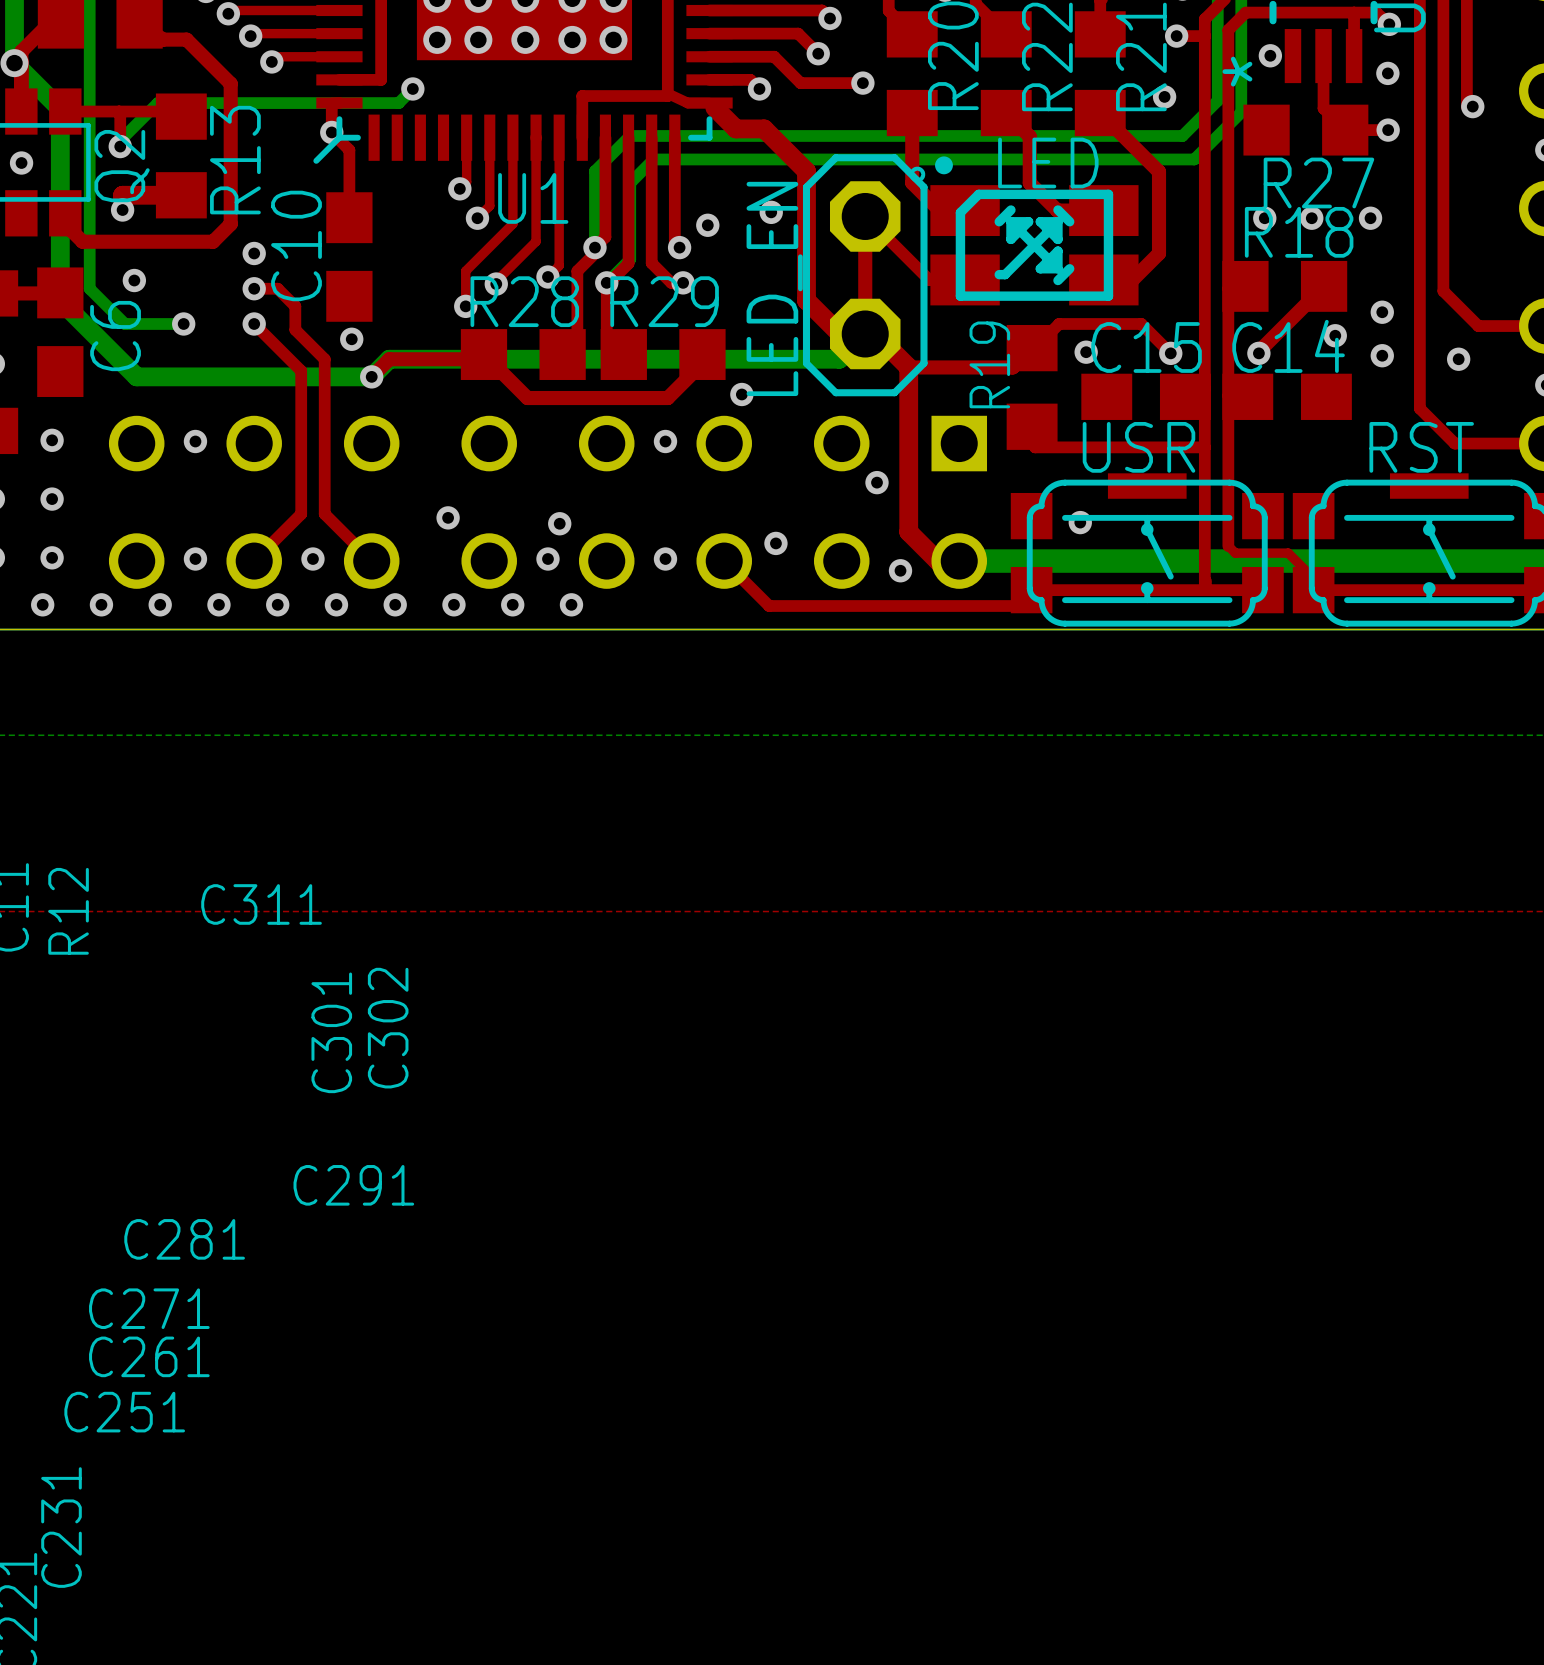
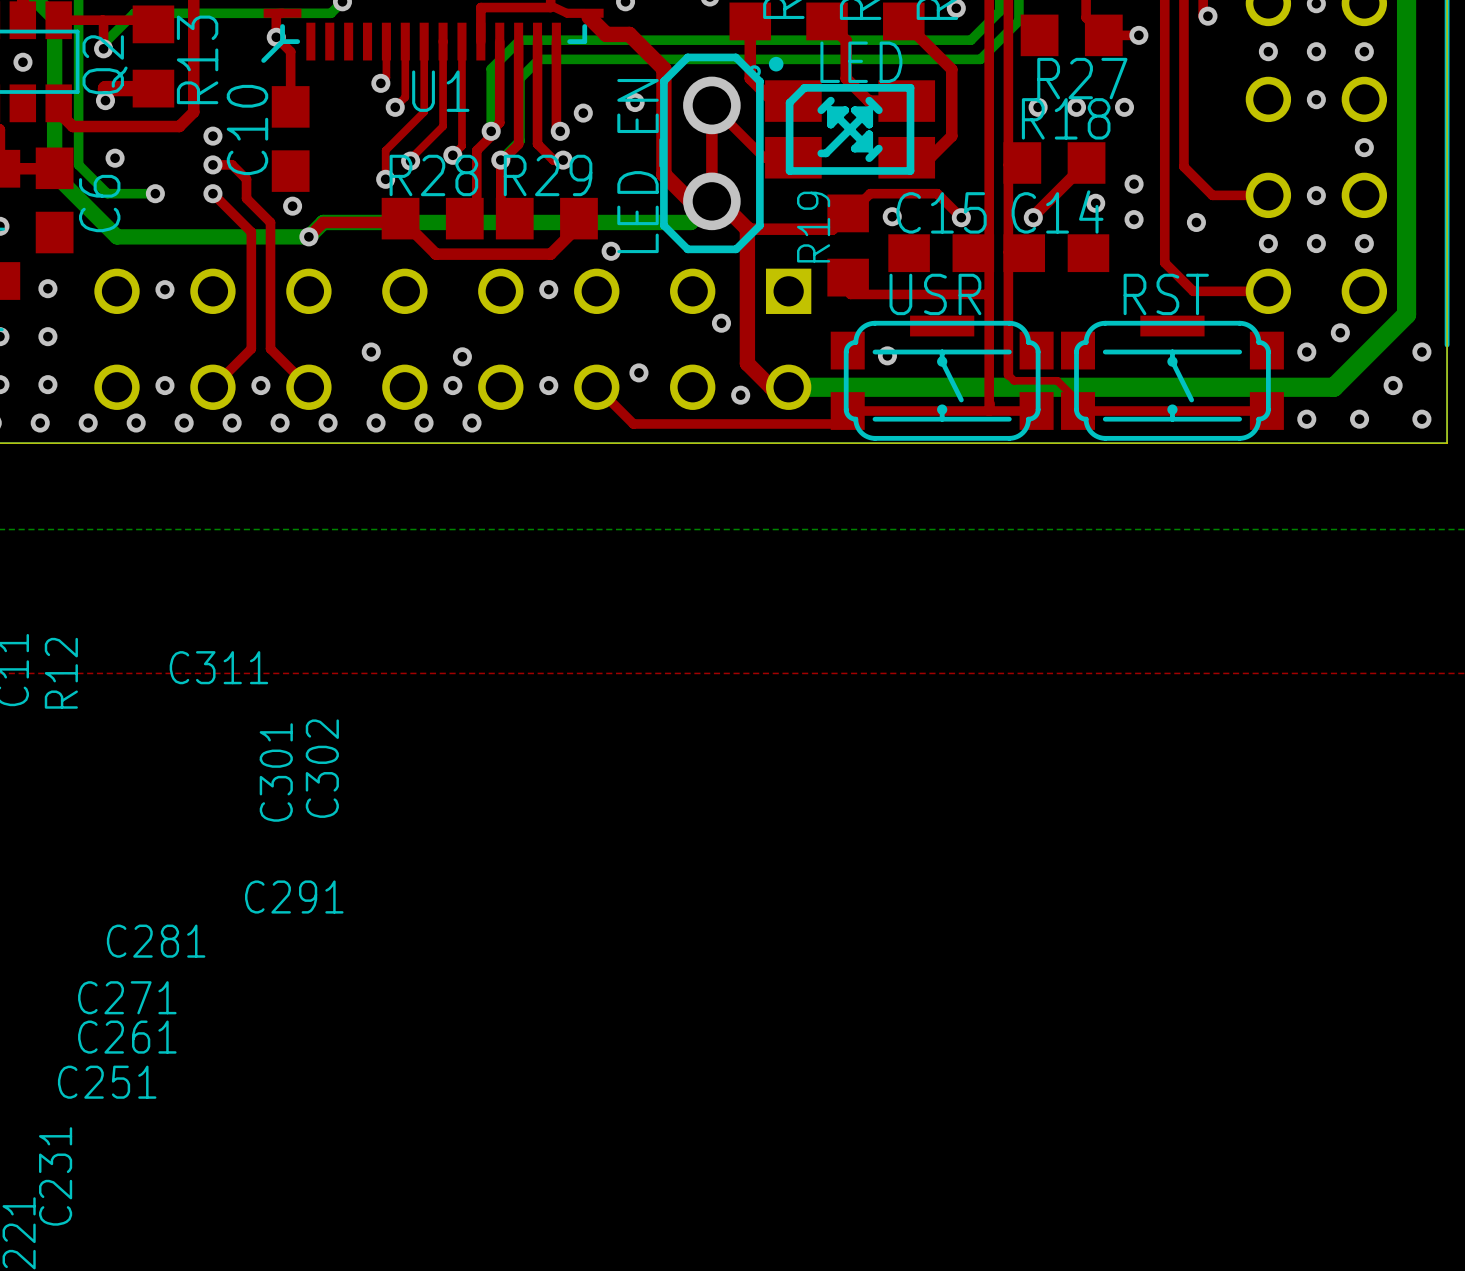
line: none -> (687, 57) (735, 57) (759, 81) (759, 225) (736, 249) (687, 249) (663, 225) (663, 81) (687, 57)
via: none -> (711, 105)
LED_EN: (865, 275) -> none
text: none -> LED_EN (639, 166)
via: none -> (711, 201)

